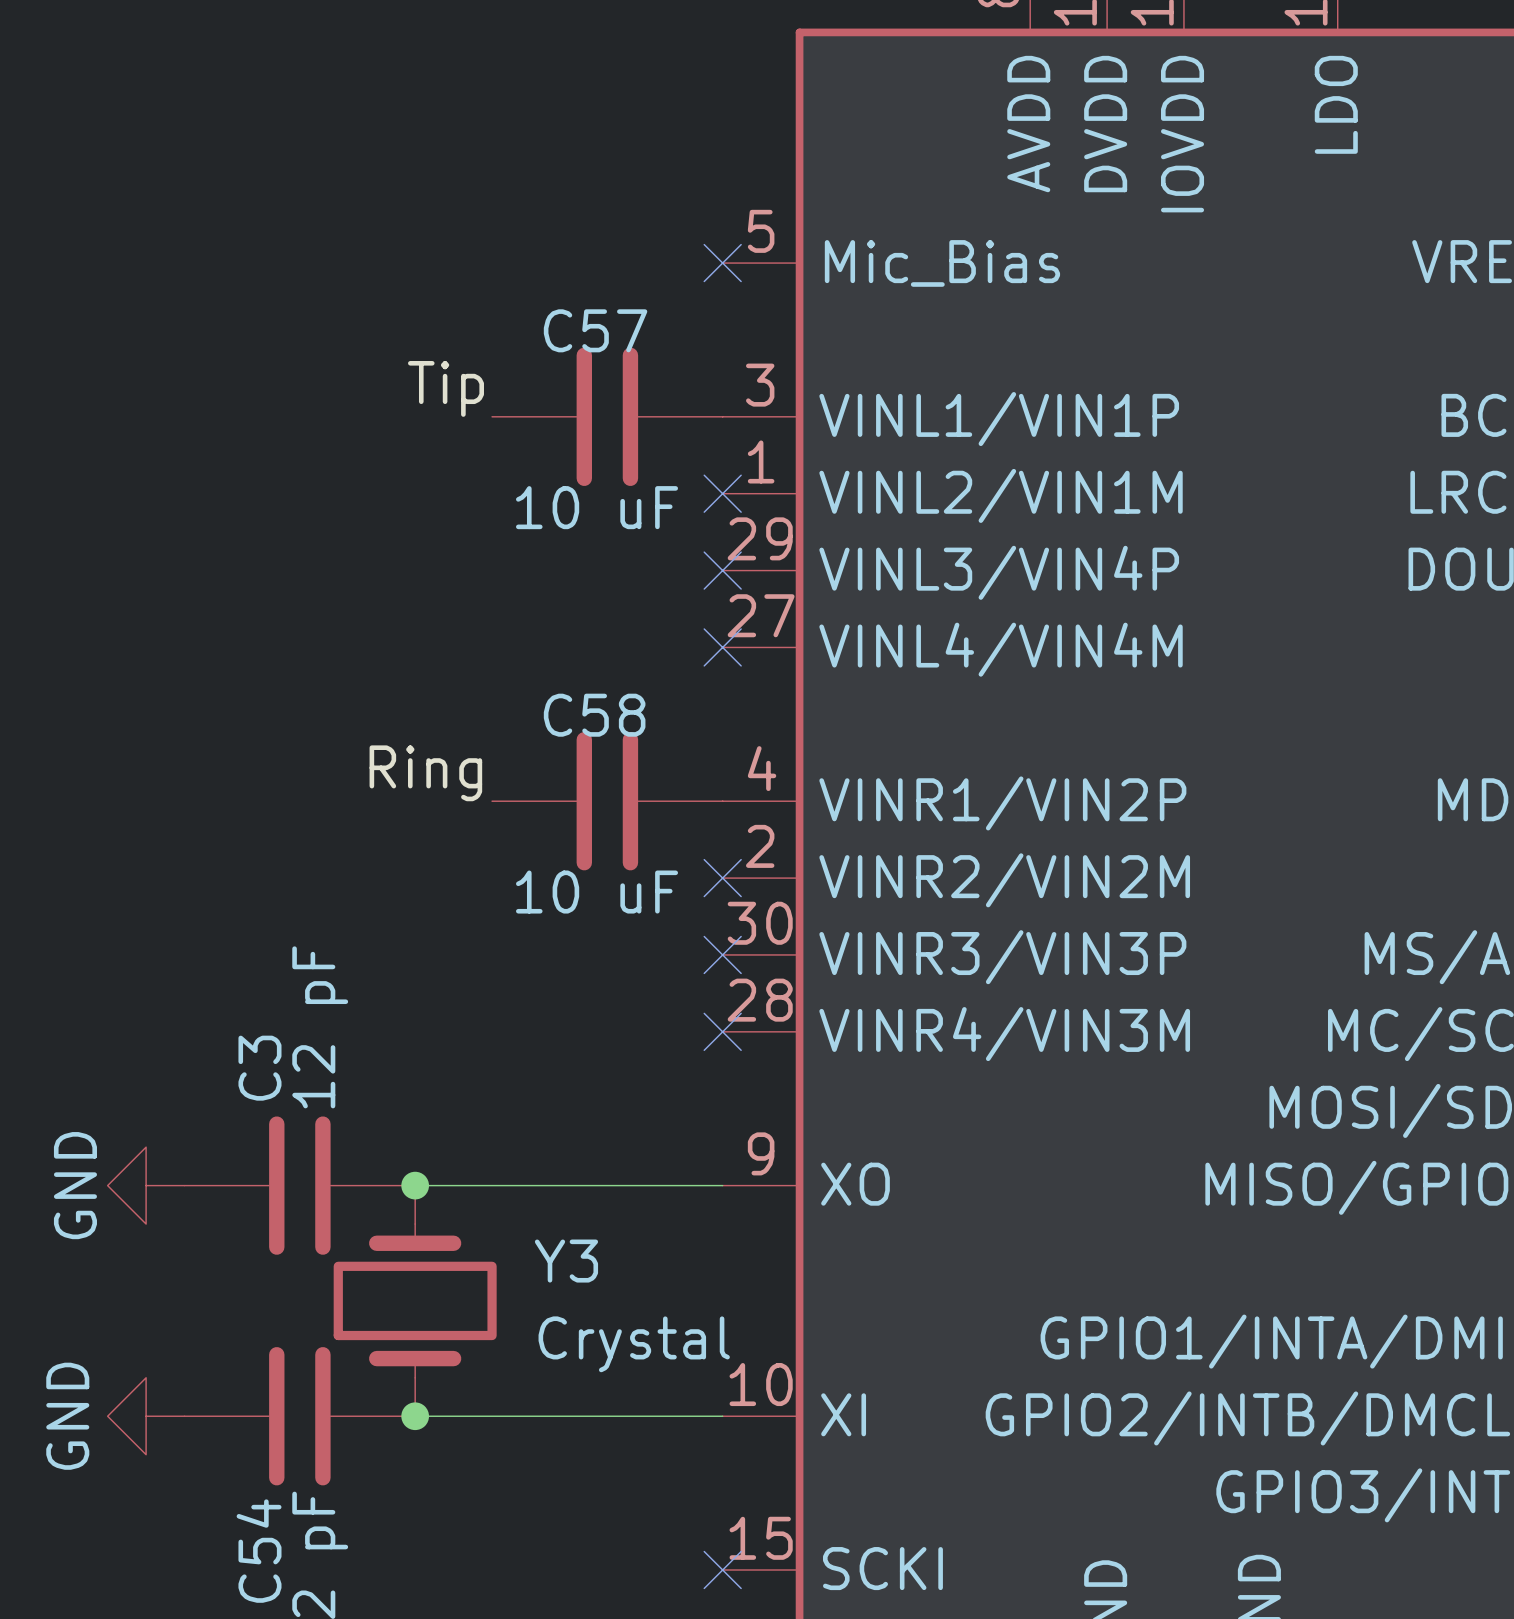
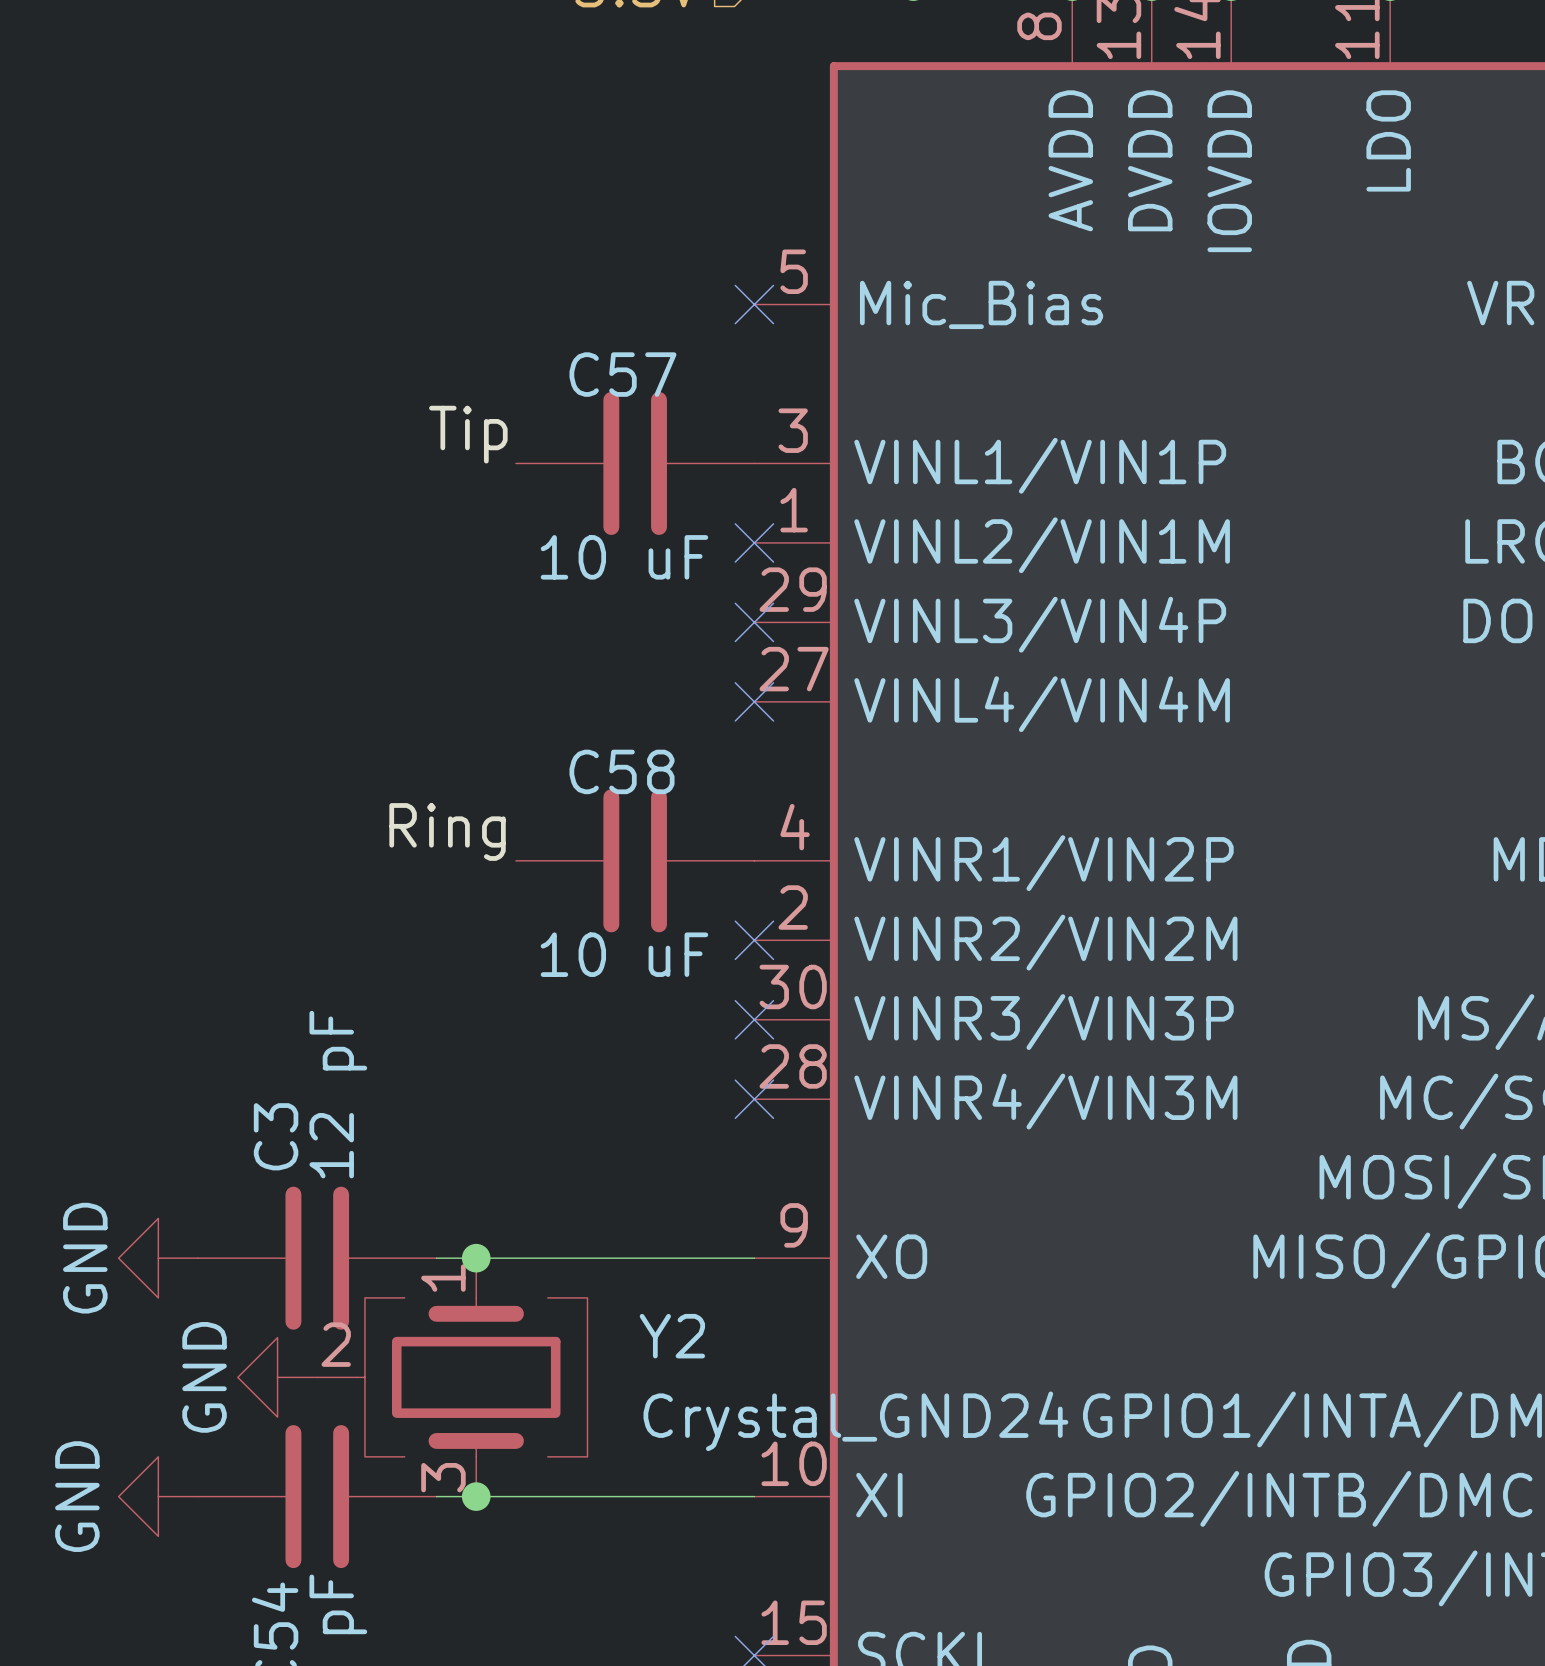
junction position: (415, 1185) -> (476, 1258)
power symbol: none -> GND (277, 1377)
Y3: Crystal (415, 1300) -> none
Y2: none -> Crystal_GND24 (452, 1377)
junction position: (415, 1416) -> (476, 1496)

